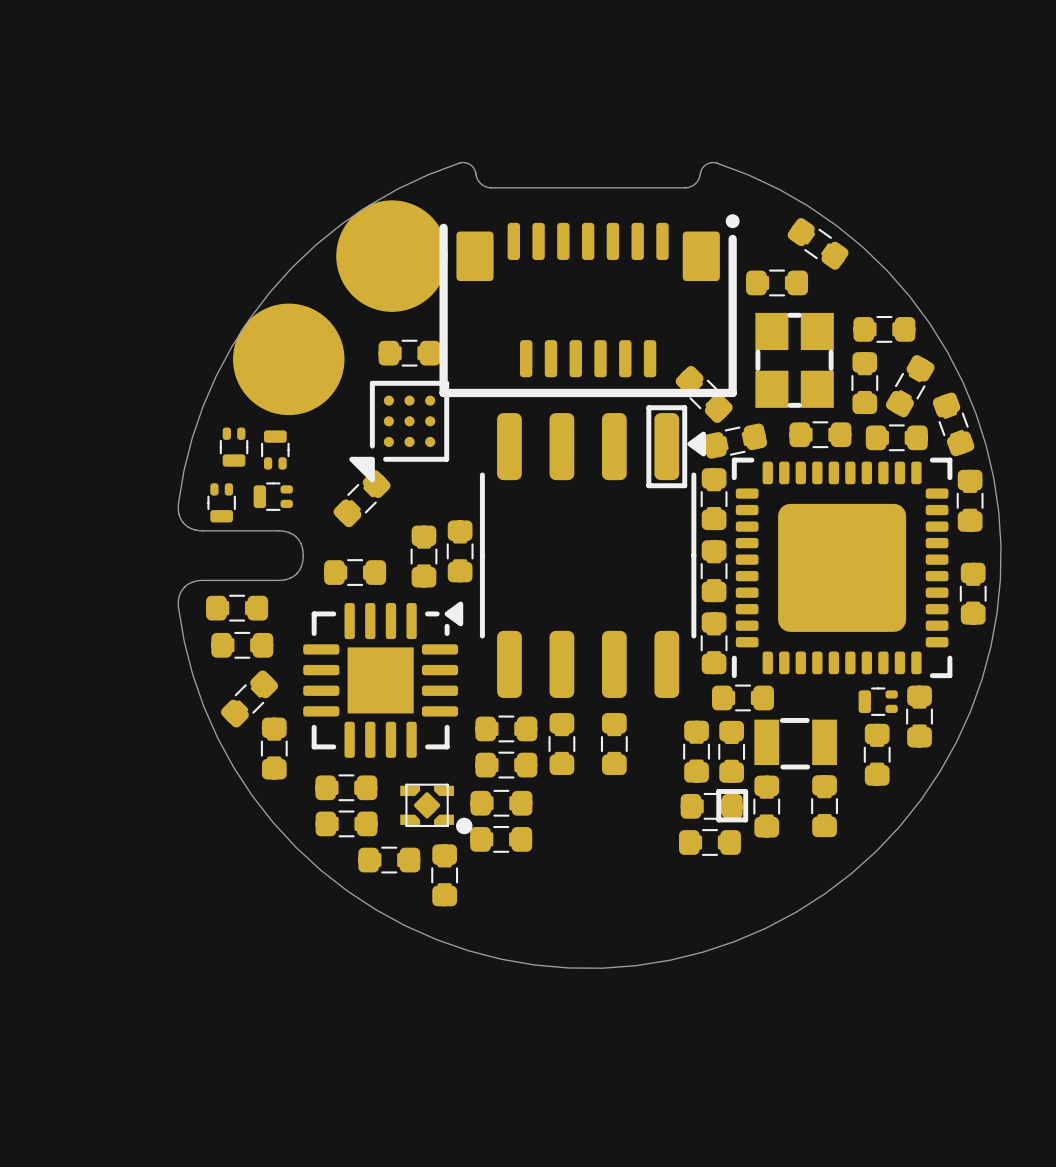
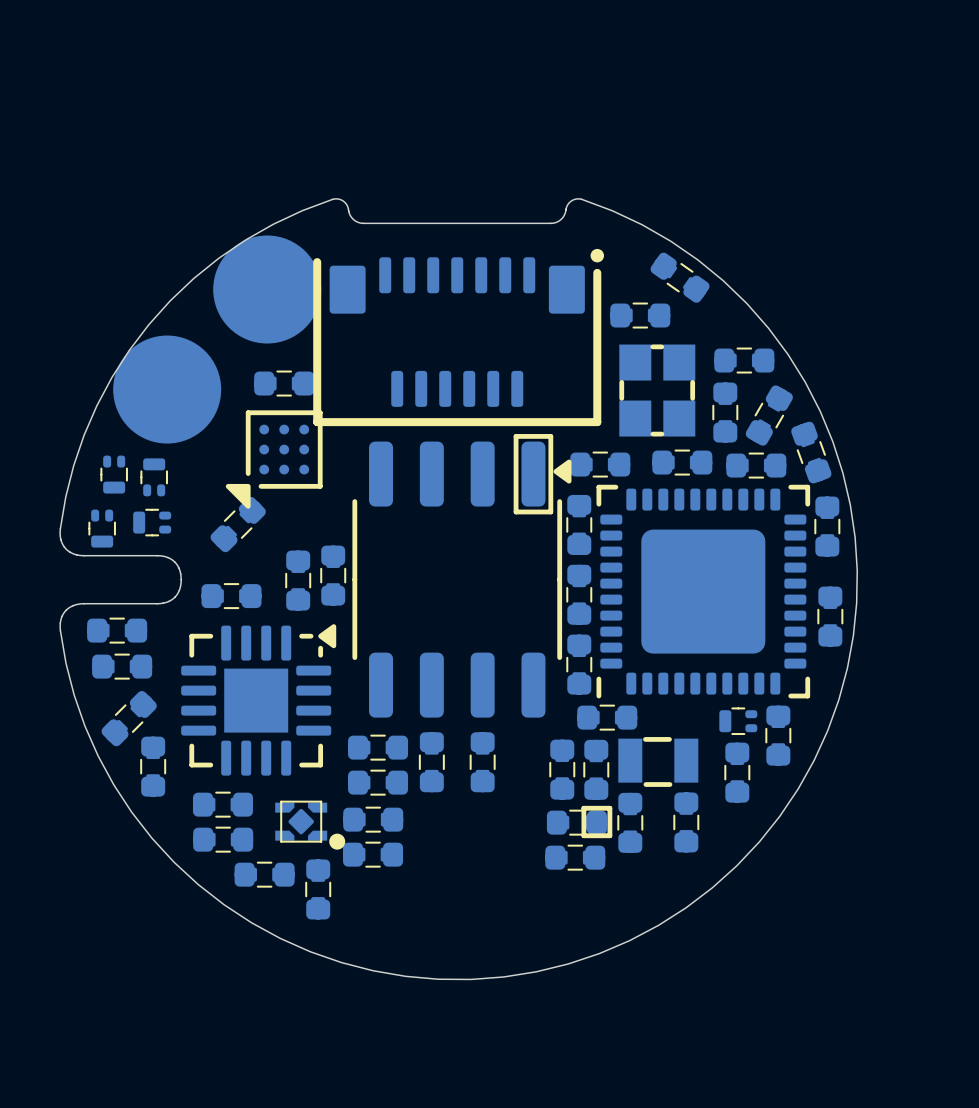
part: (704, 394) -> none
part rotation: 0° (735, 441) -> 12° clockwise (600, 464)

